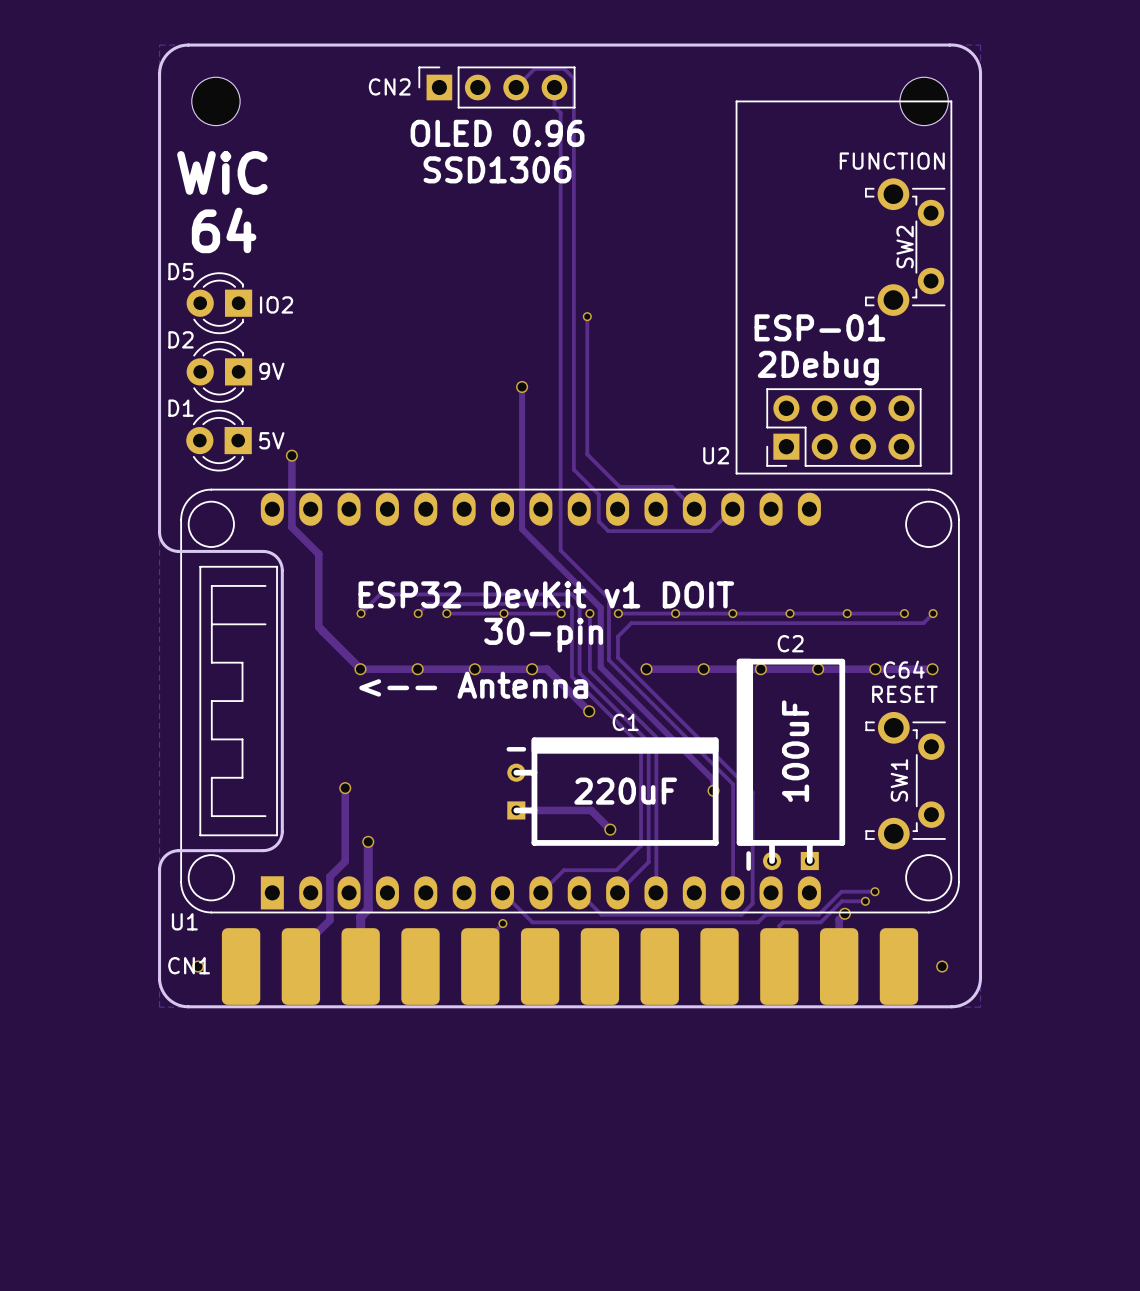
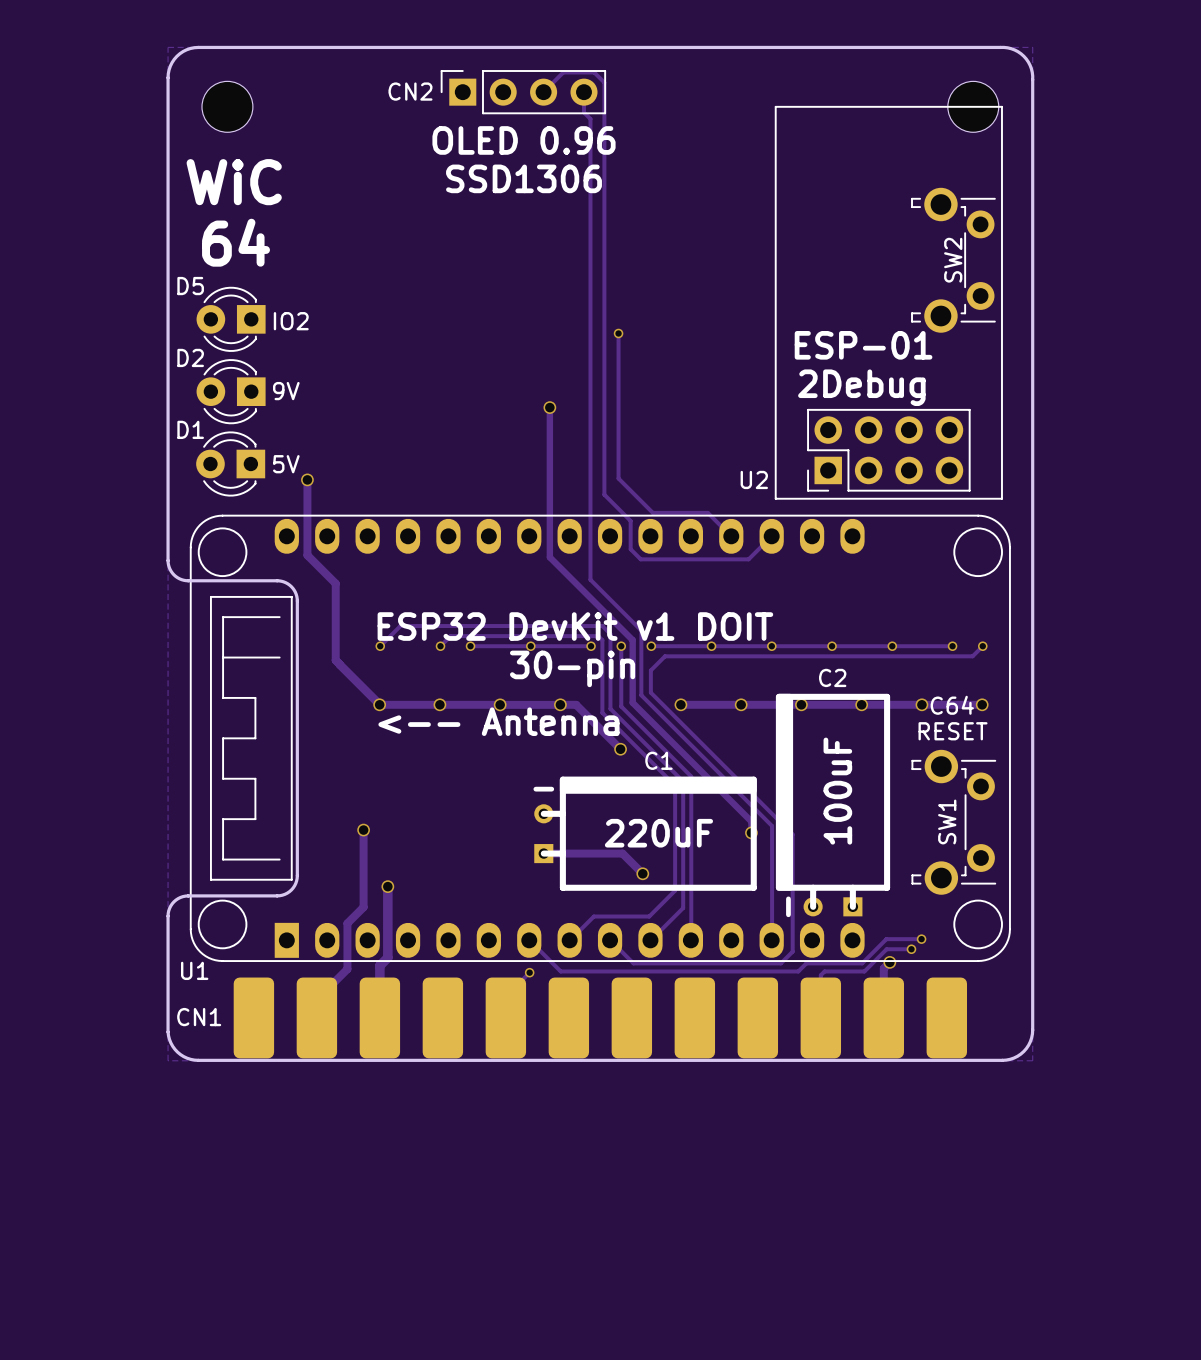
text: FUNCTION (892, 161) -> none
via: (197, 966) -> none
via: (942, 966) -> none

